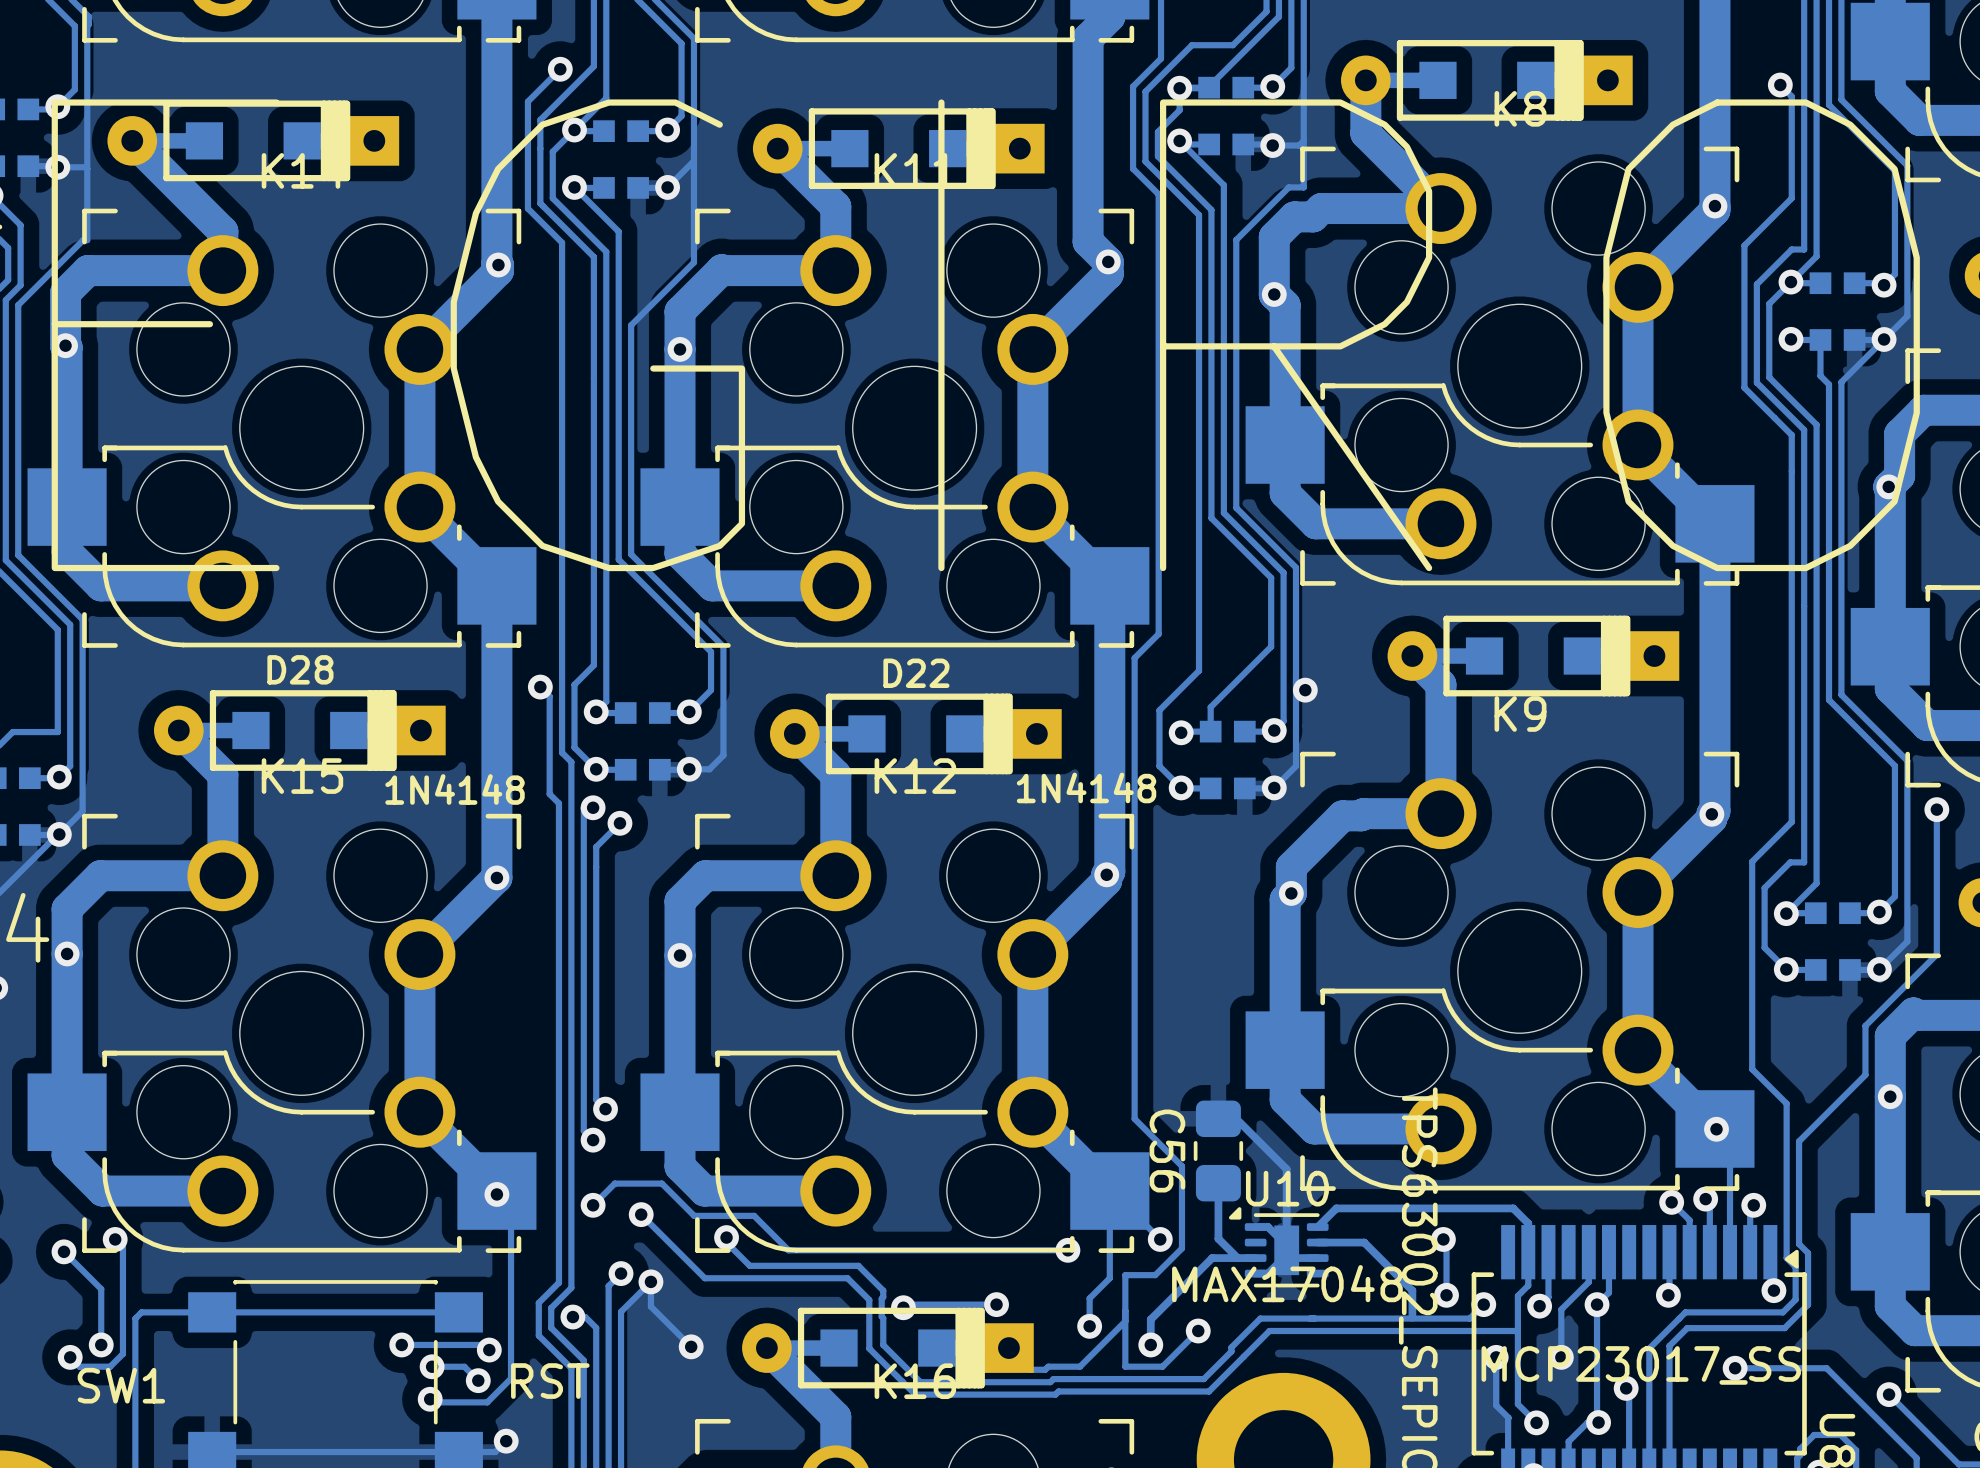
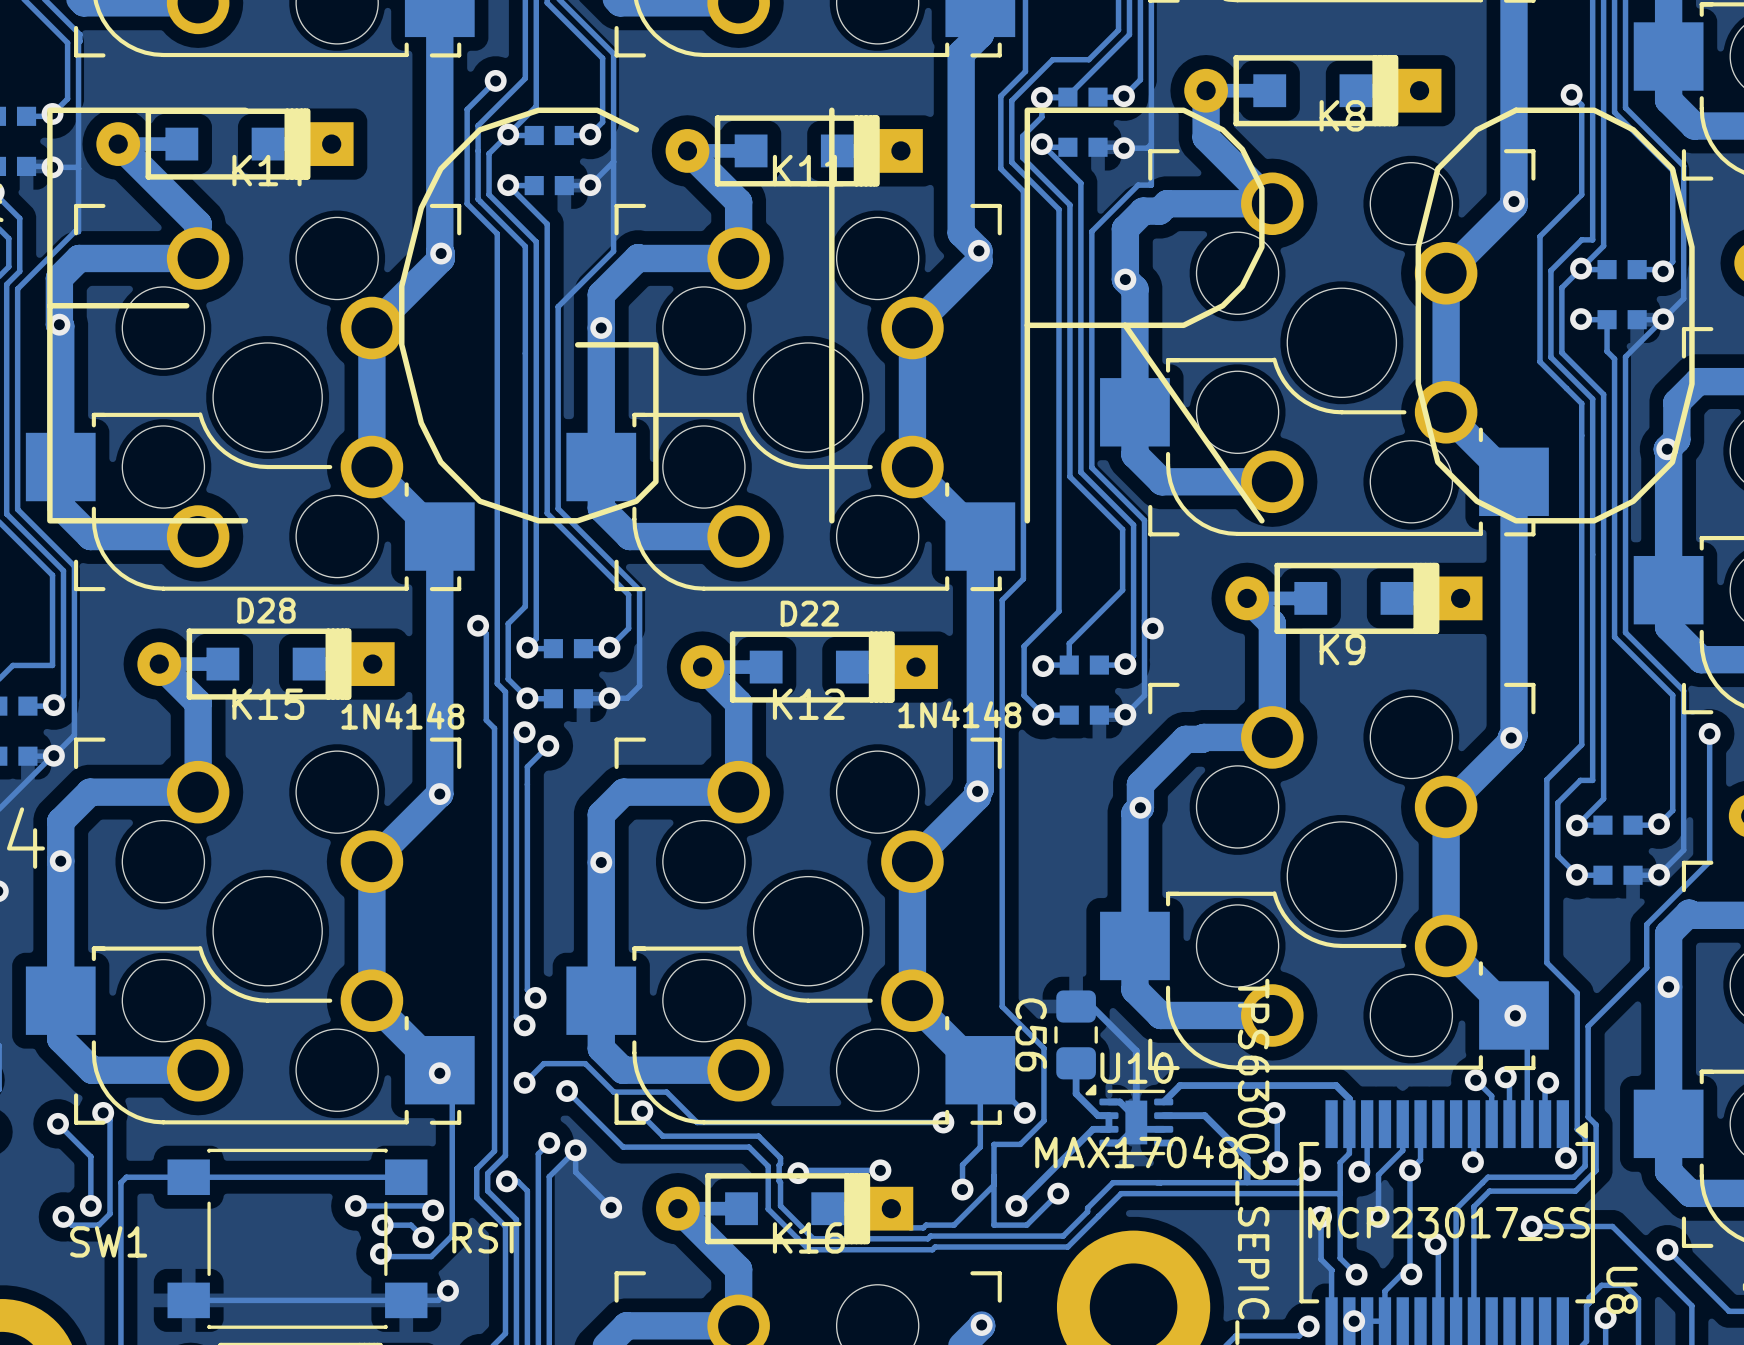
track: (1218, 1217) (1218, 1238) (1237, 1258) (1212, 1258) (1150, 1319) (1150, 1344) -> (1093, 1129) (1016, 1205)
track: none -> (1076, 1093) (1098, 1115) (1108, 1115) (1108, 1129)

